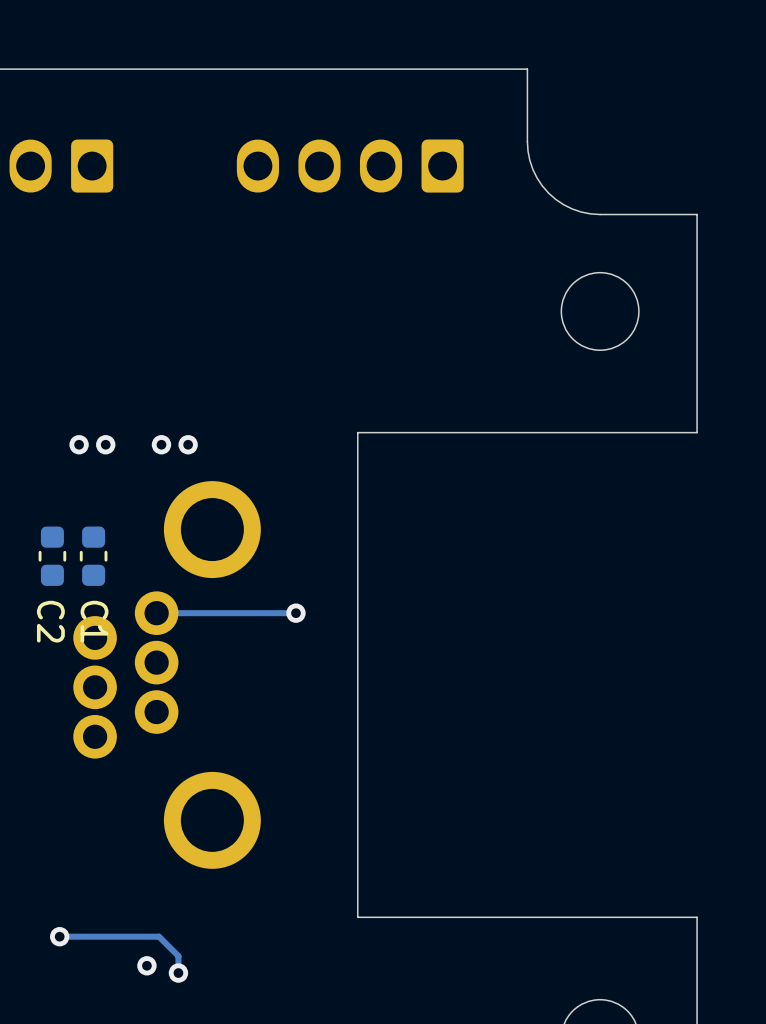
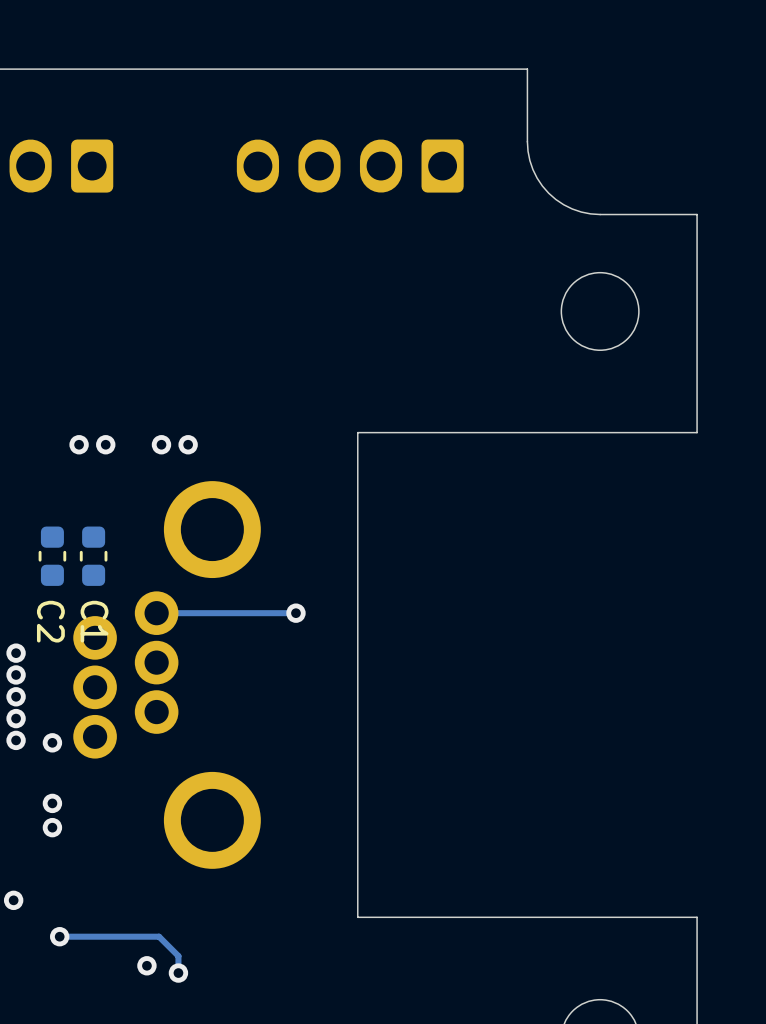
via: none -> (16, 653)
via: none -> (16, 674)
via: none -> (16, 696)
via: none -> (16, 718)
via: none -> (16, 740)
via: none -> (52, 742)
via: none -> (52, 803)
via: none -> (52, 827)
via: none -> (13, 900)

